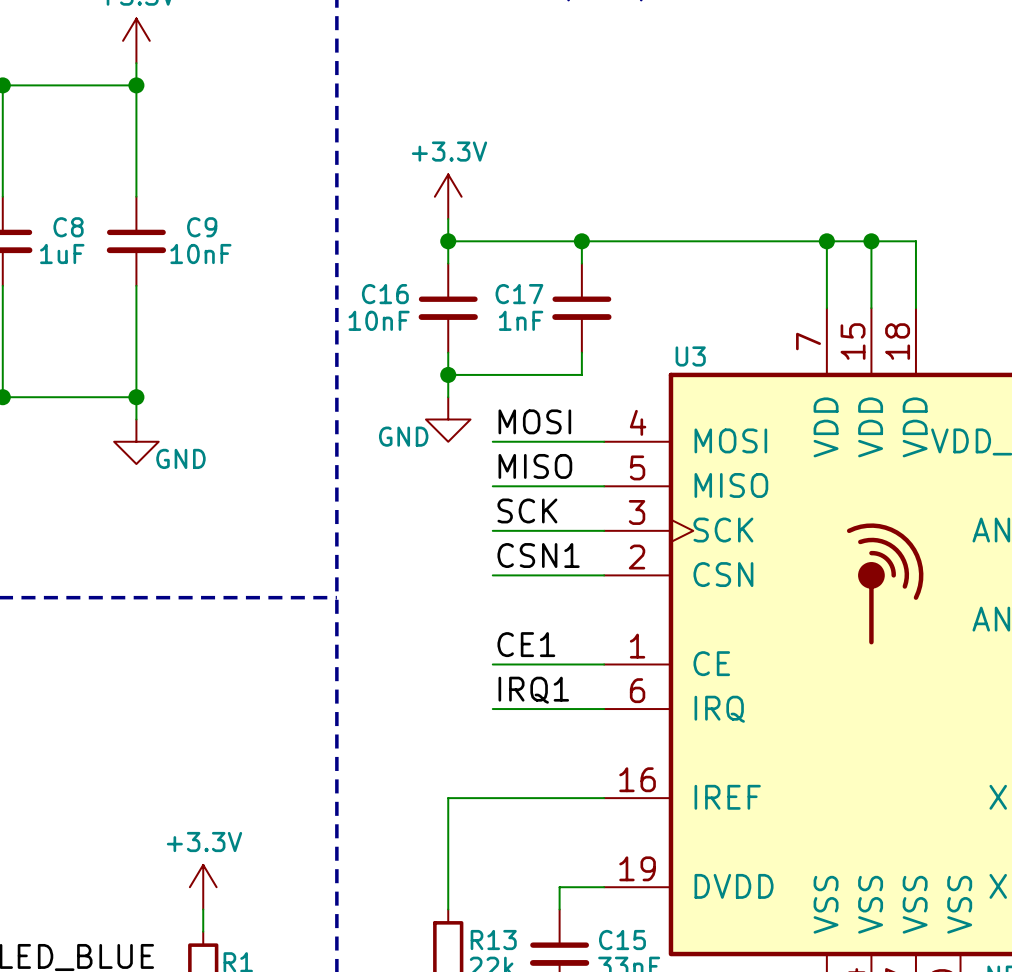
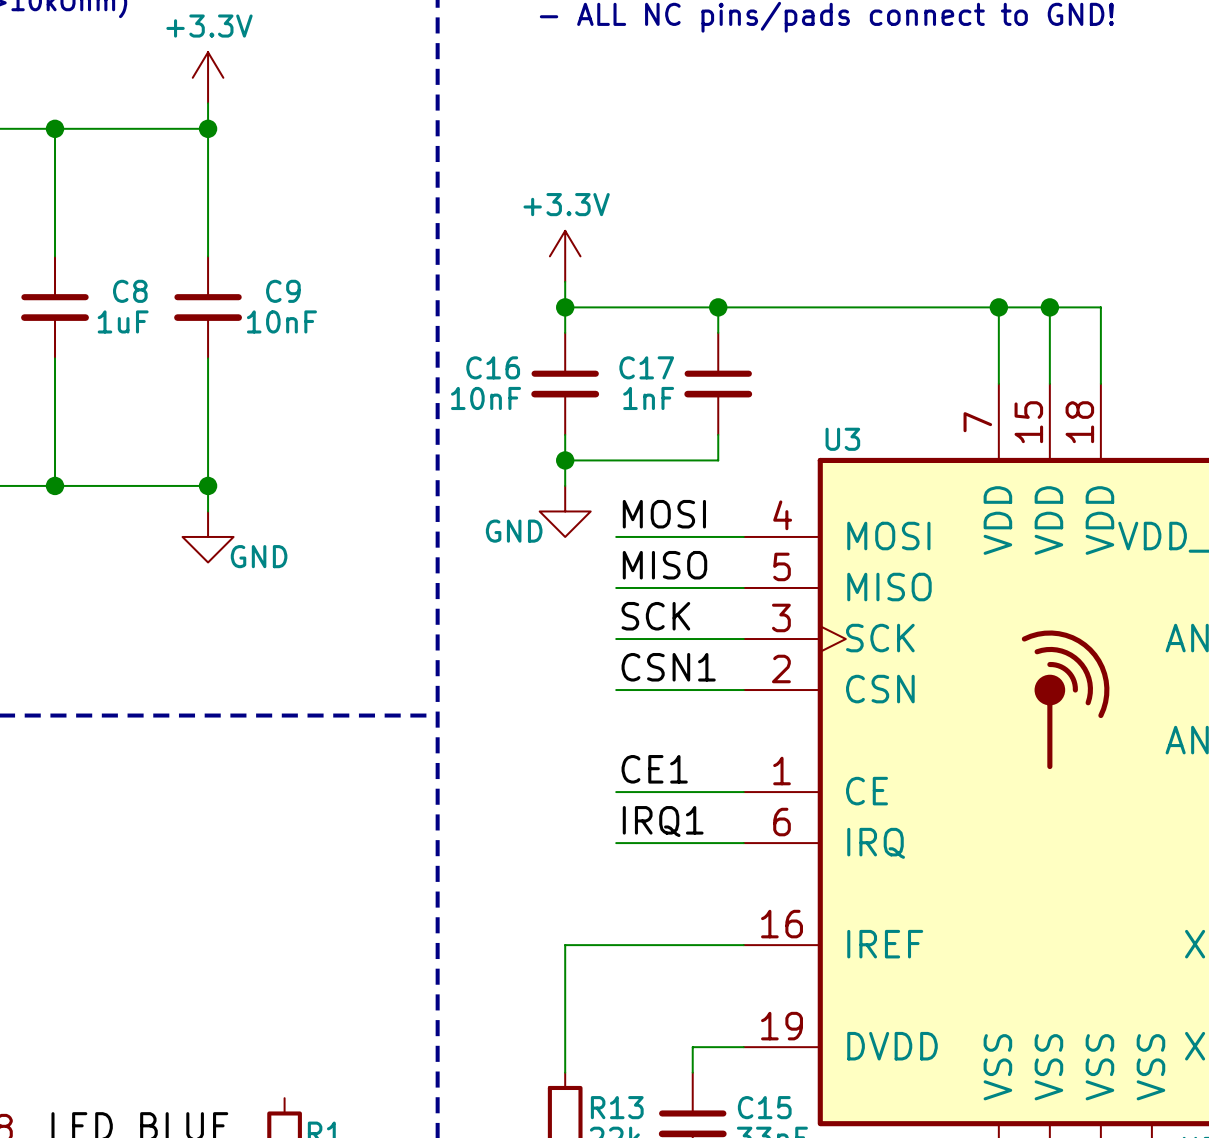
power symbol: +3.3V (203, 887) -> none
wire: (203, 909) (203, 931) -> none

